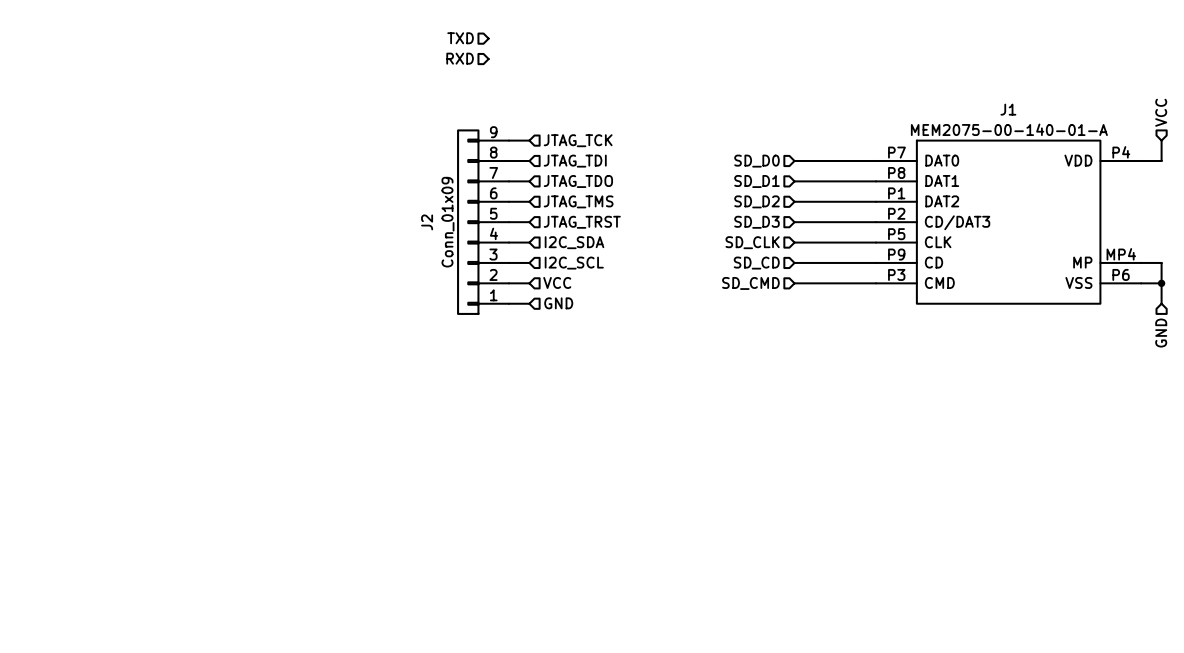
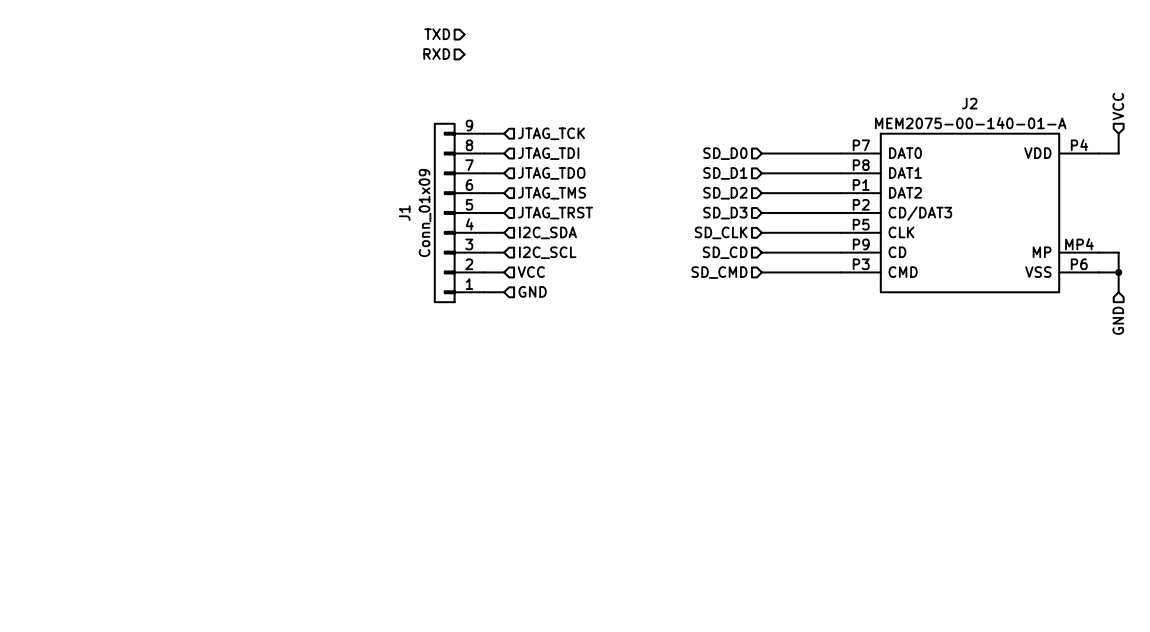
J1 name: J1 (1008, 109) -> J2 (969, 103)
J2 name: J2 (427, 222) -> J1 (404, 213)

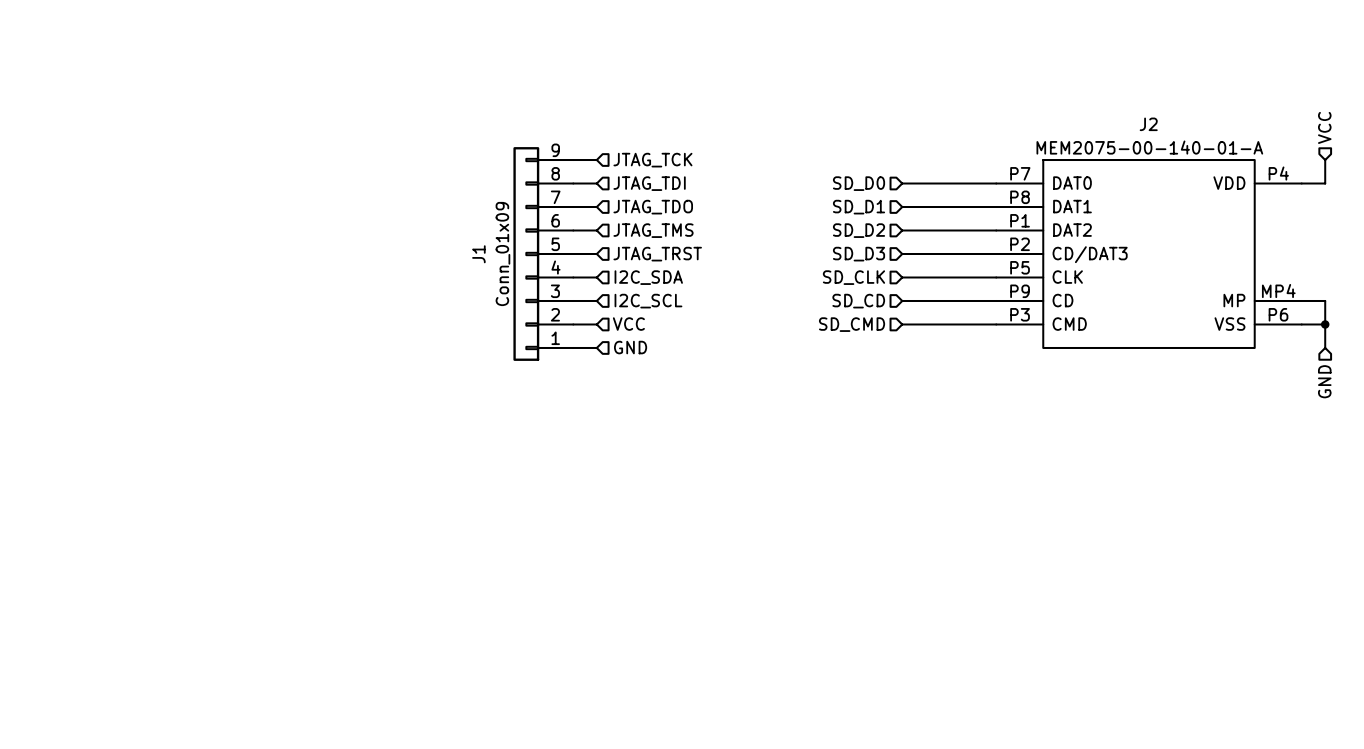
hierarchical label: TXD (437, 34) -> none
hierarchical label: RXD (436, 54) -> none

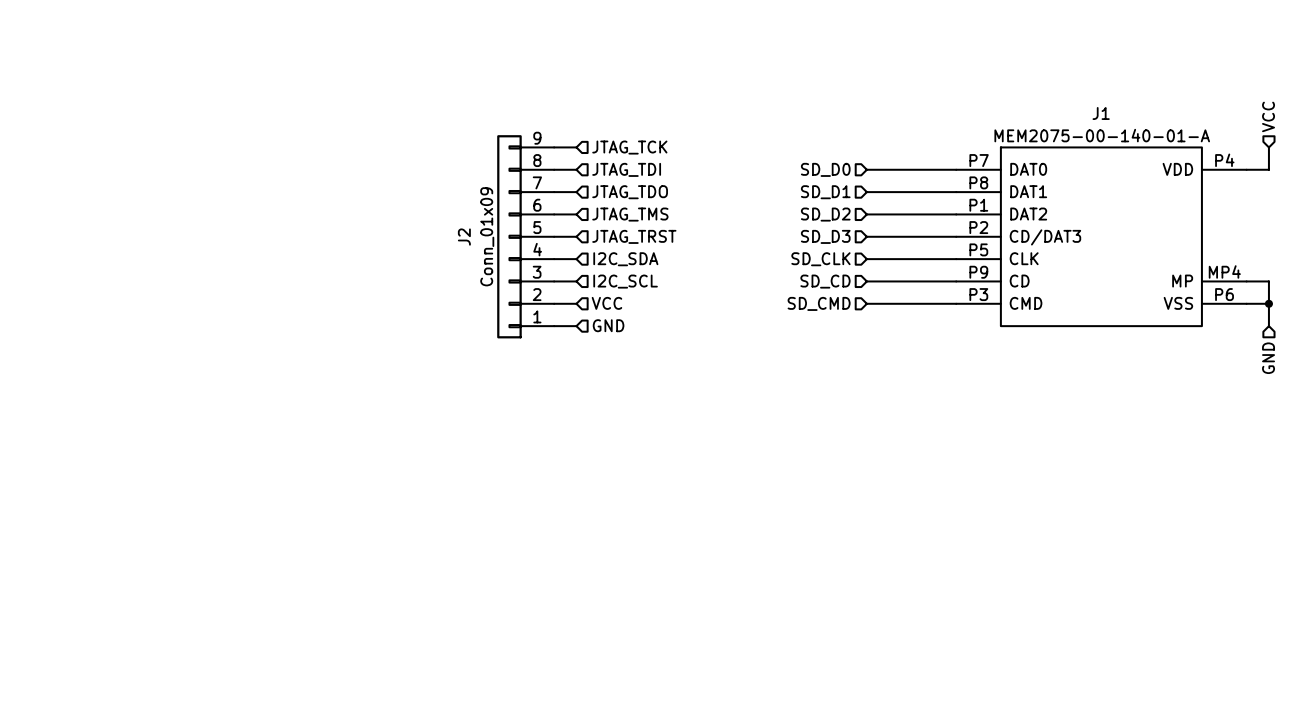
J2 name: J2 (1148, 124) -> J1 (1101, 113)
J1 name: J1 (478, 254) -> J2 (464, 237)

